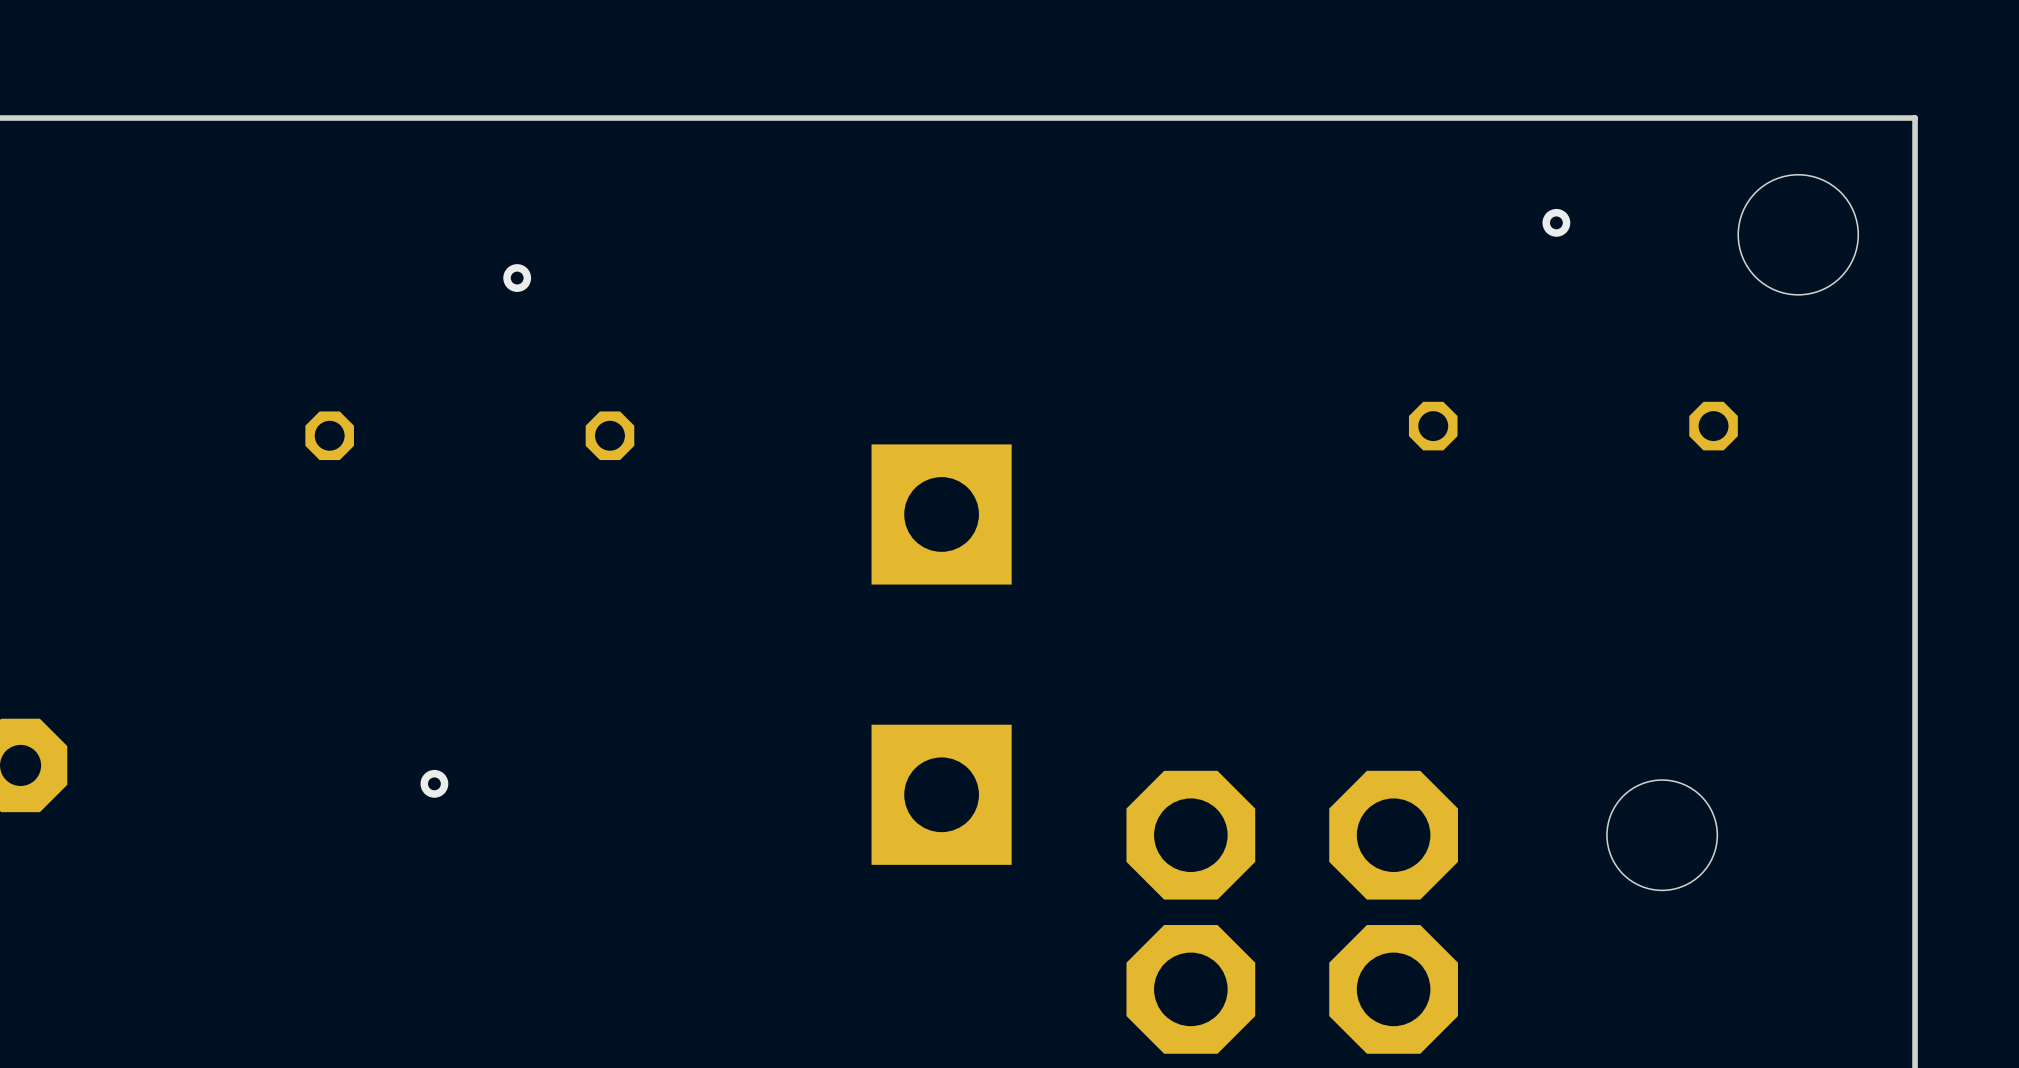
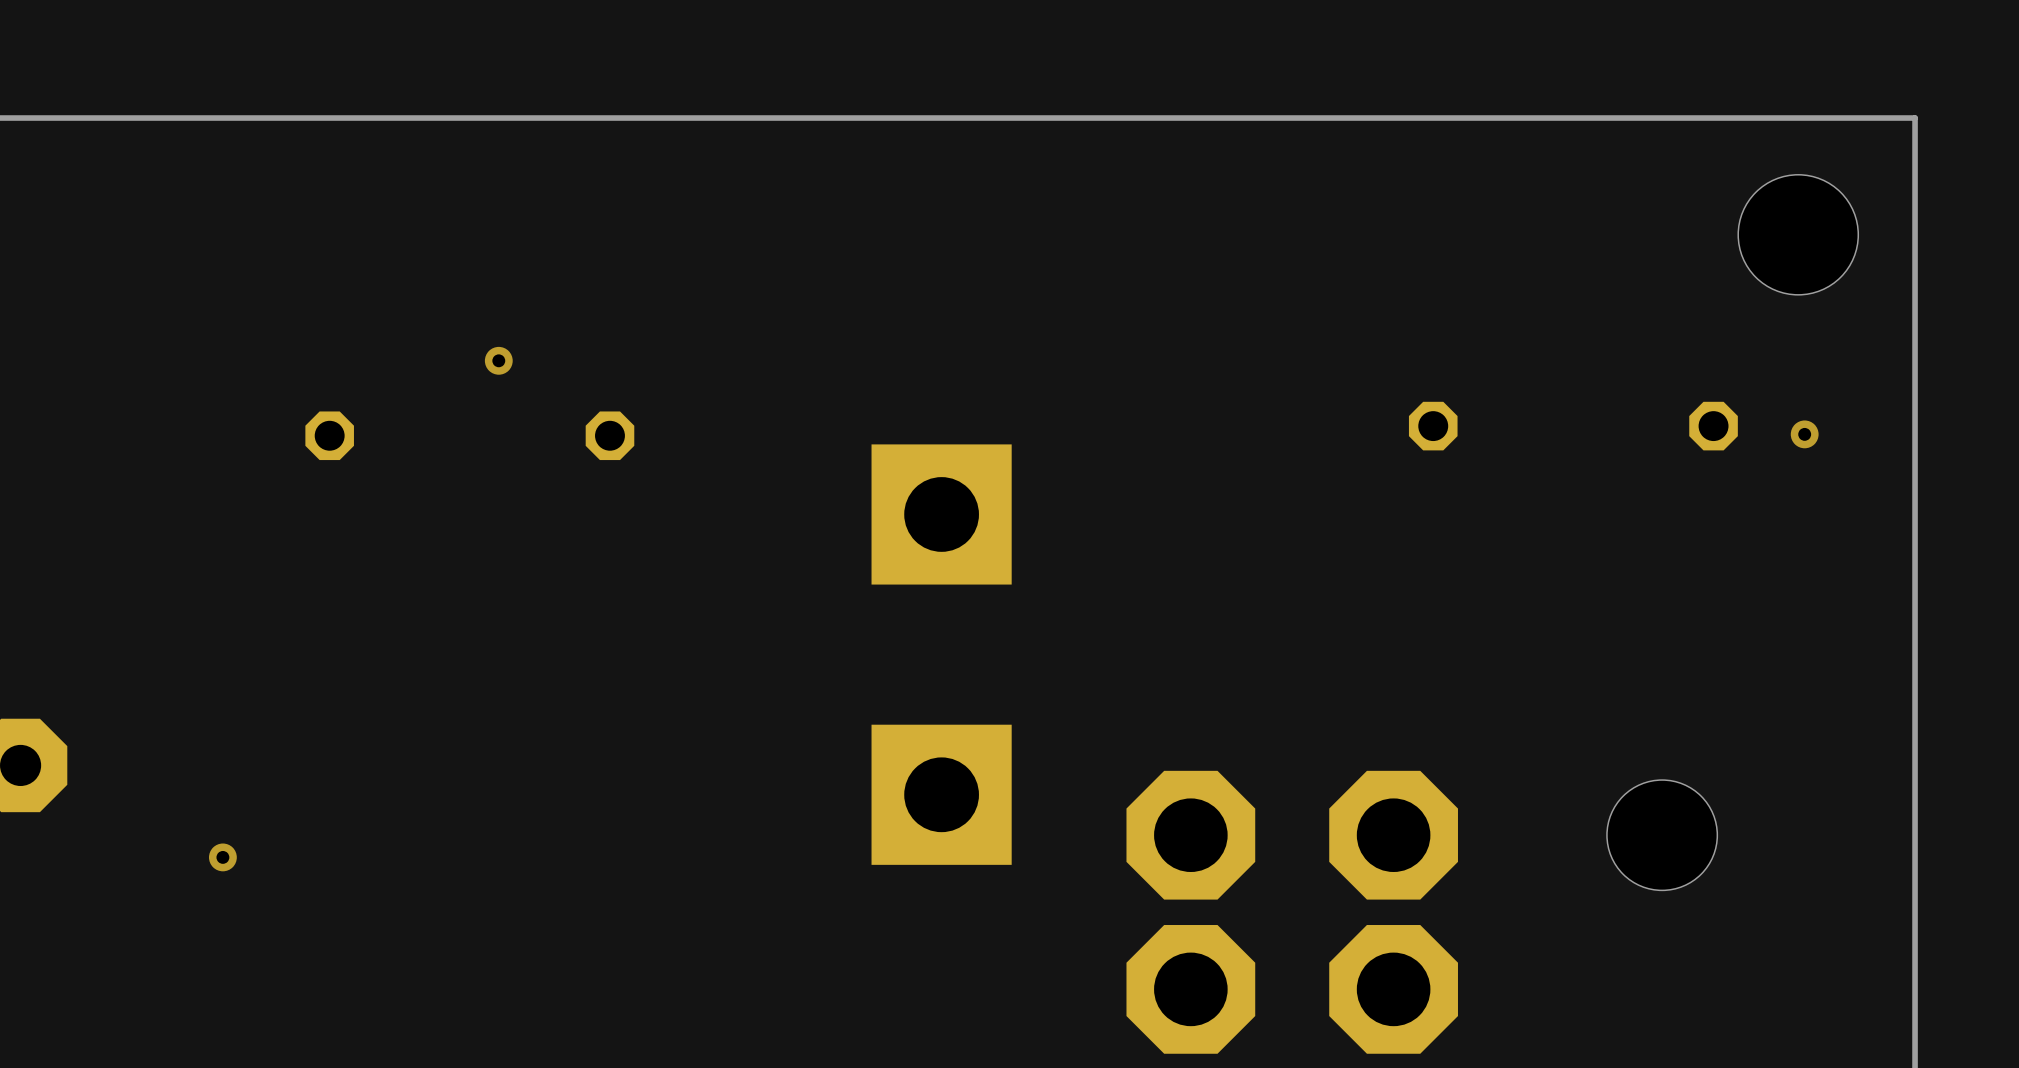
via: (1556, 222) -> none
via position: (517, 278) -> (498, 360)
via: none -> (1804, 434)
via: (434, 783) -> none
via: none -> (222, 857)

